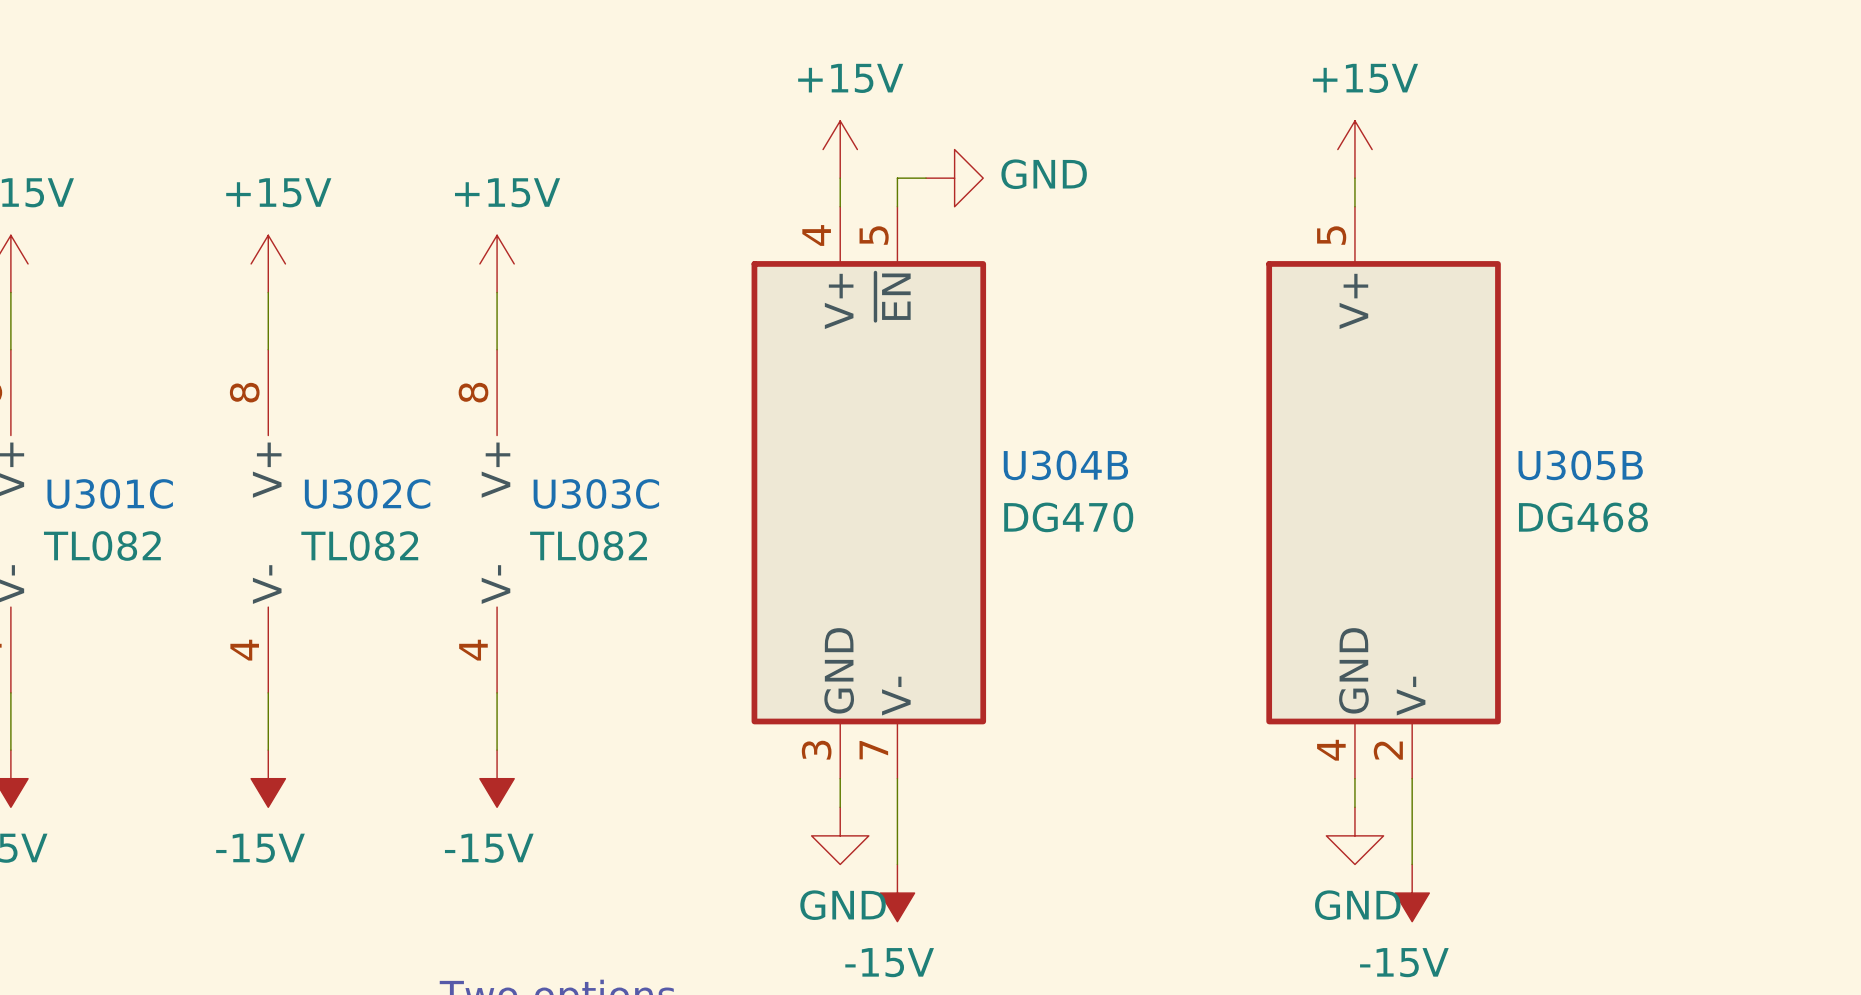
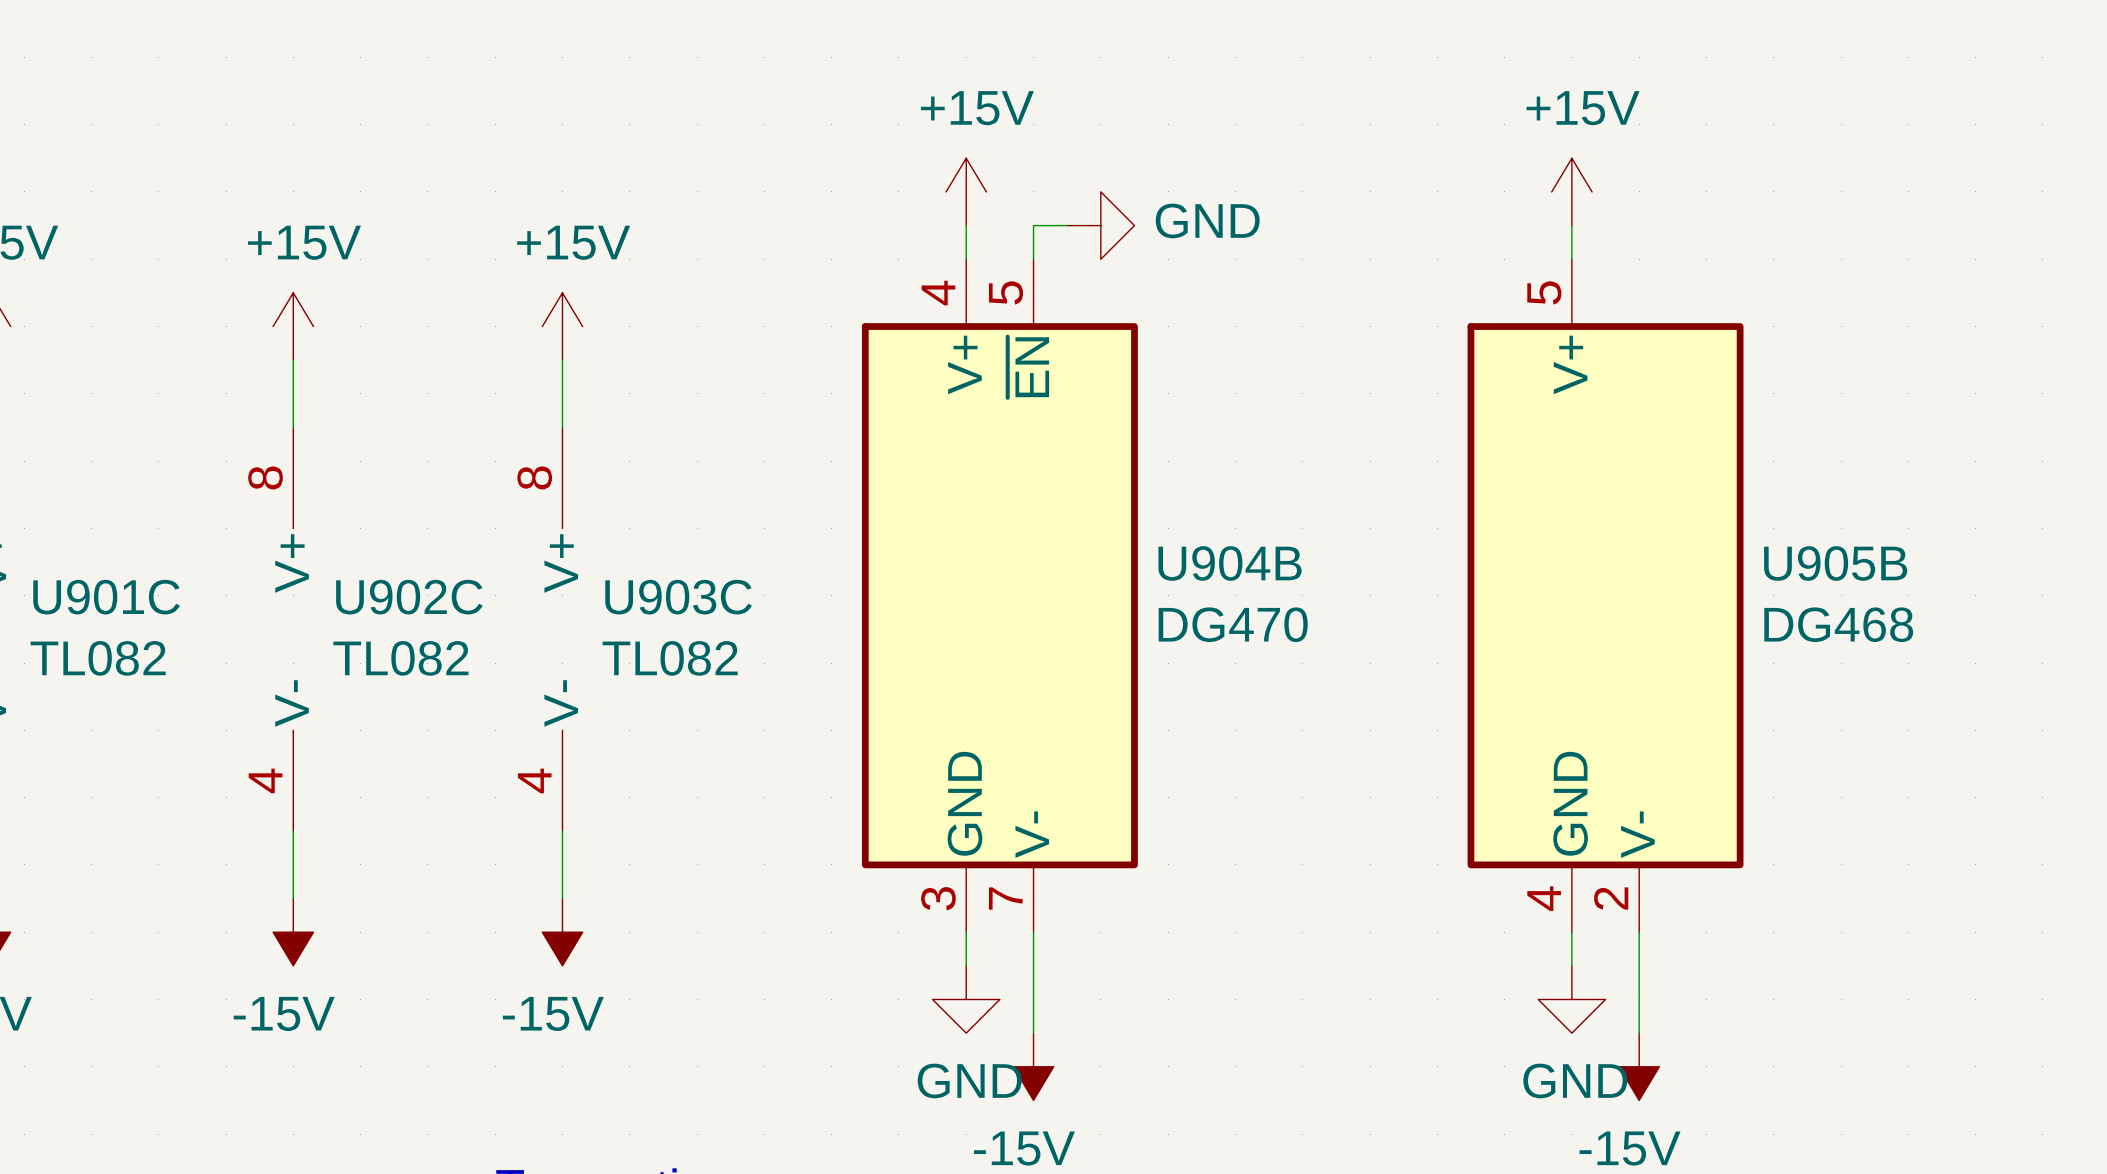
U304B name: U304B (1065, 465) -> U904B (1230, 563)
U305B name: U305B (1580, 465) -> U905B (1835, 563)
U301C name: U301C (110, 493) -> U901C (106, 597)
U302C name: U302C (367, 493) -> U902C (409, 597)
U303C name: U303C (596, 493) -> U903C (678, 597)

